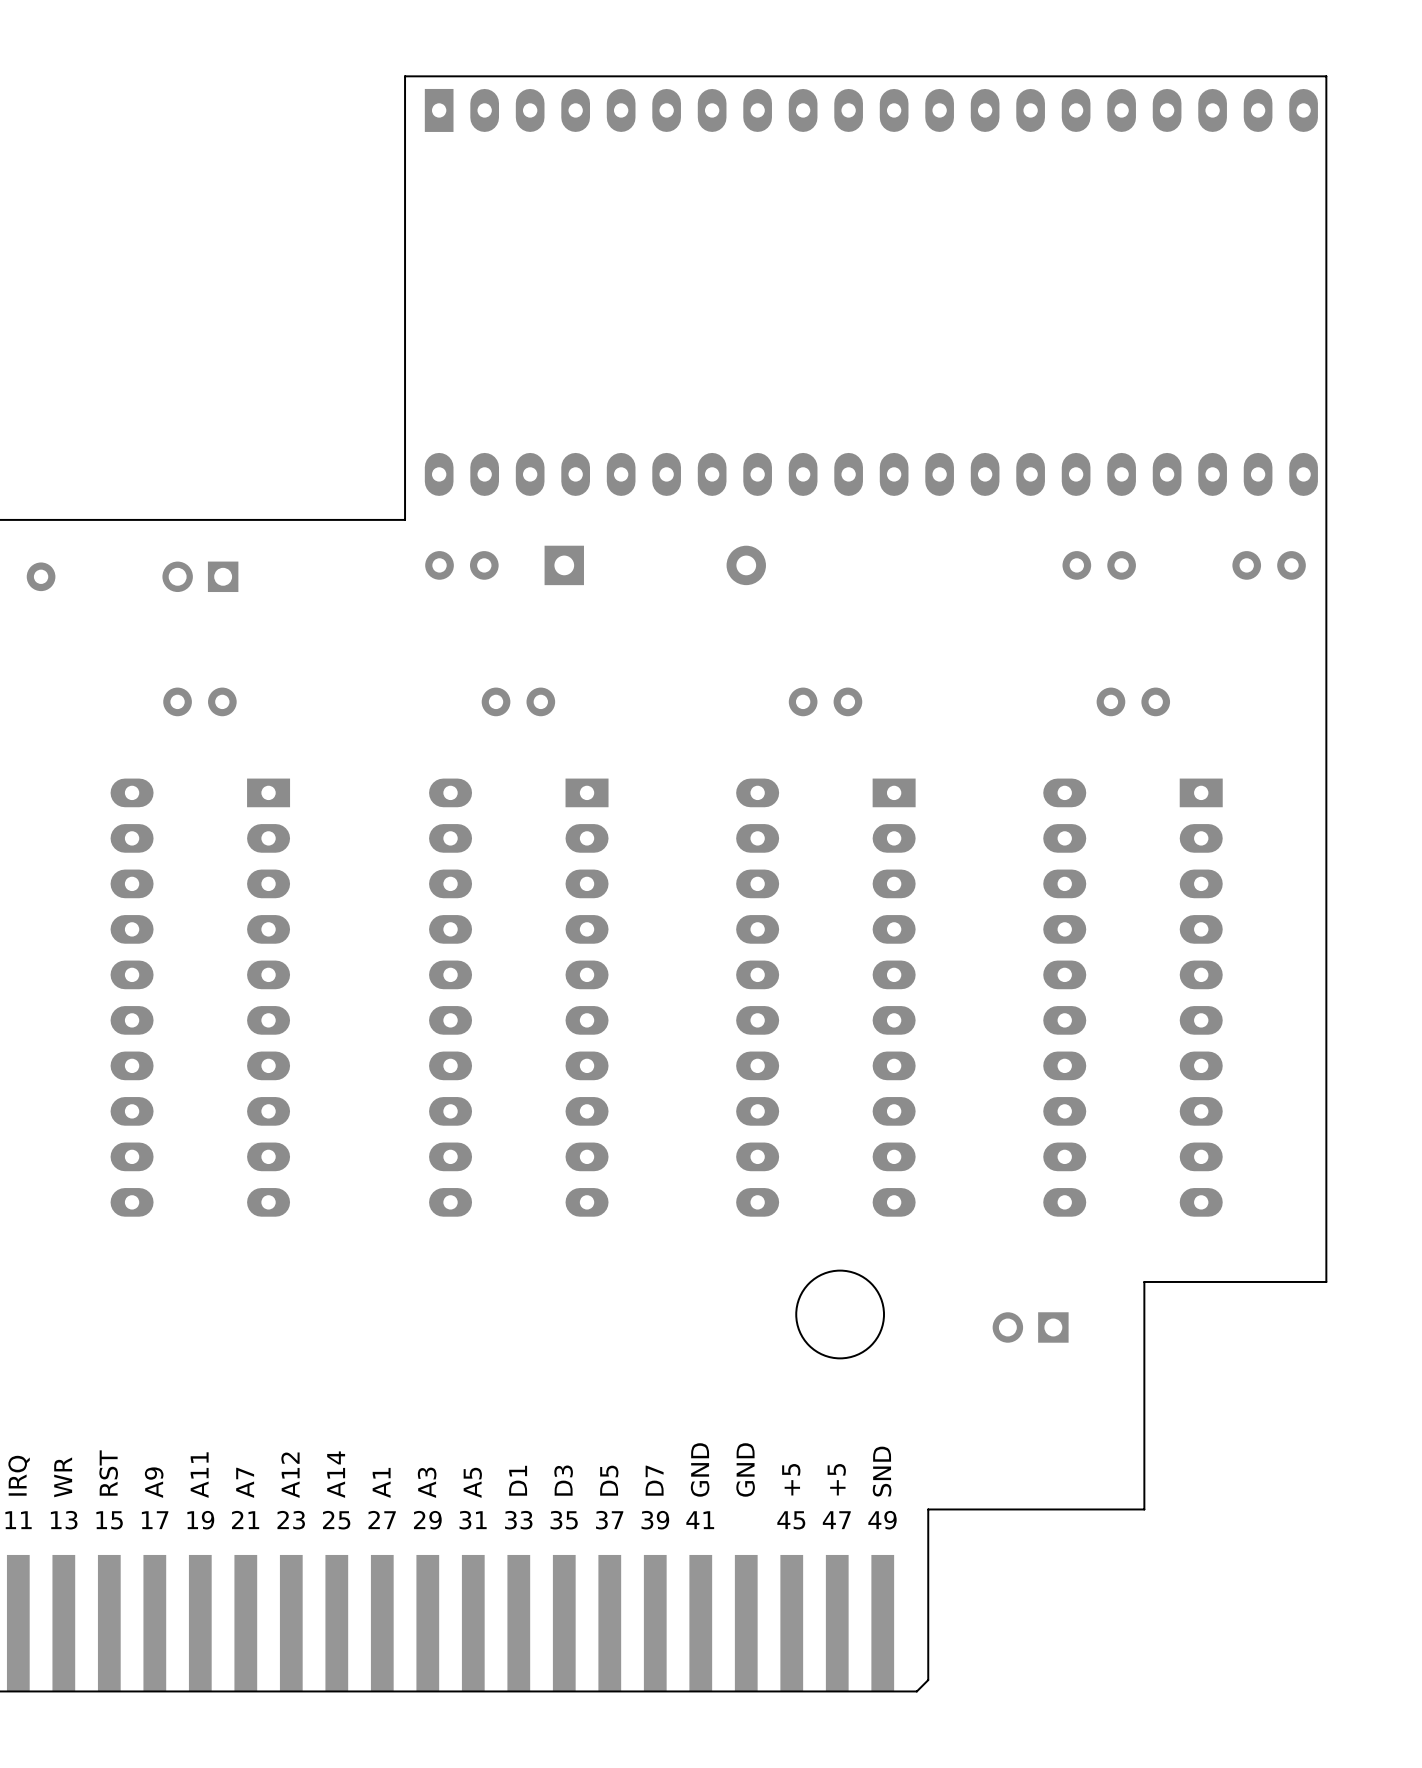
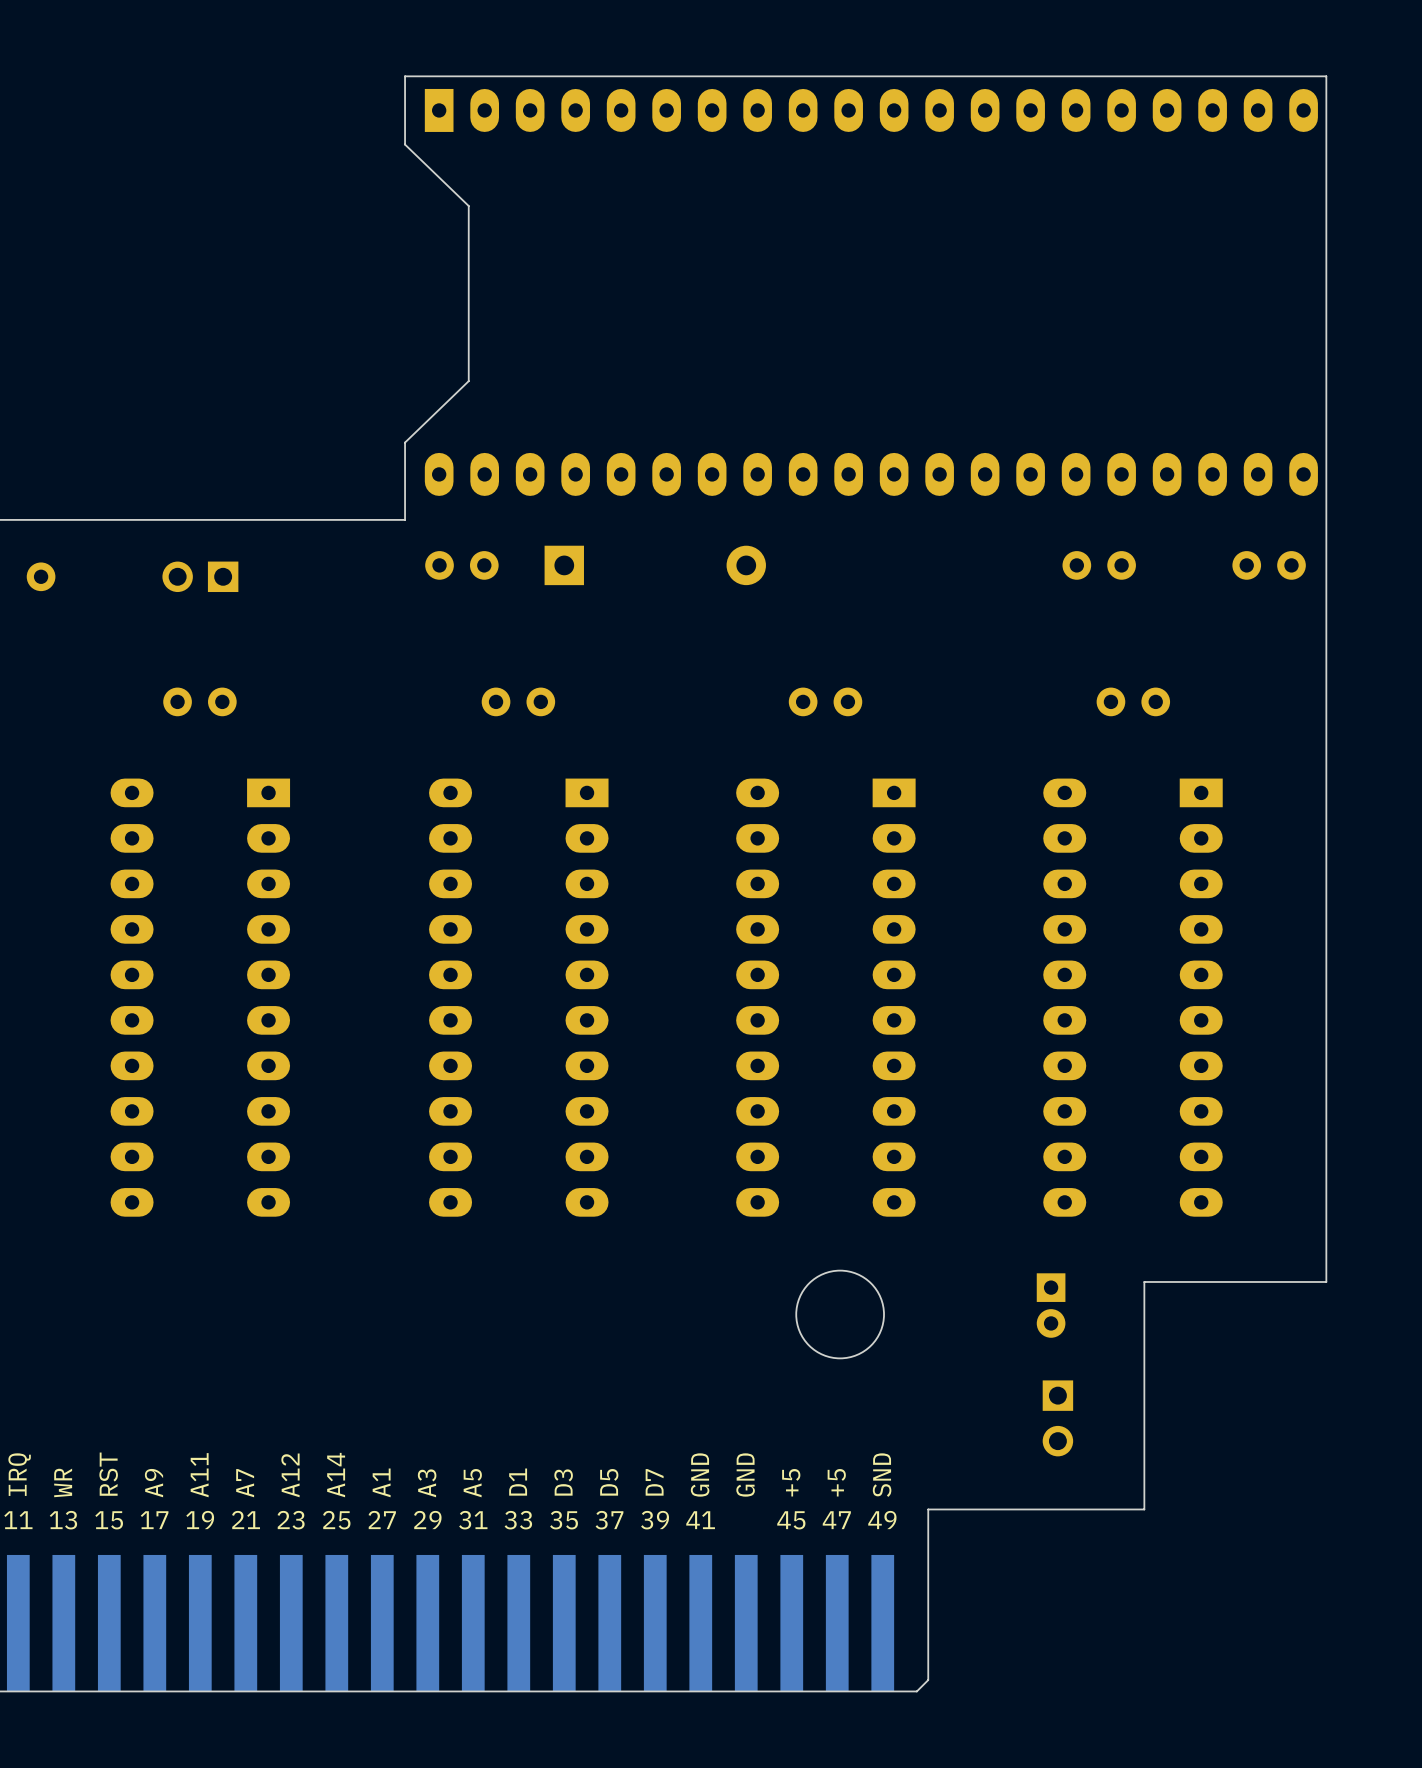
board edge: (405, 144) (405, 442) -> (405, 144) (468, 206) (468, 381) (405, 442)
part: none -> (1051, 1305)
part rotation: 0° (1030, 1327) -> 90° counterclockwise (1057, 1418)
part position: (1030, 1327) -> (1057, 1418)

